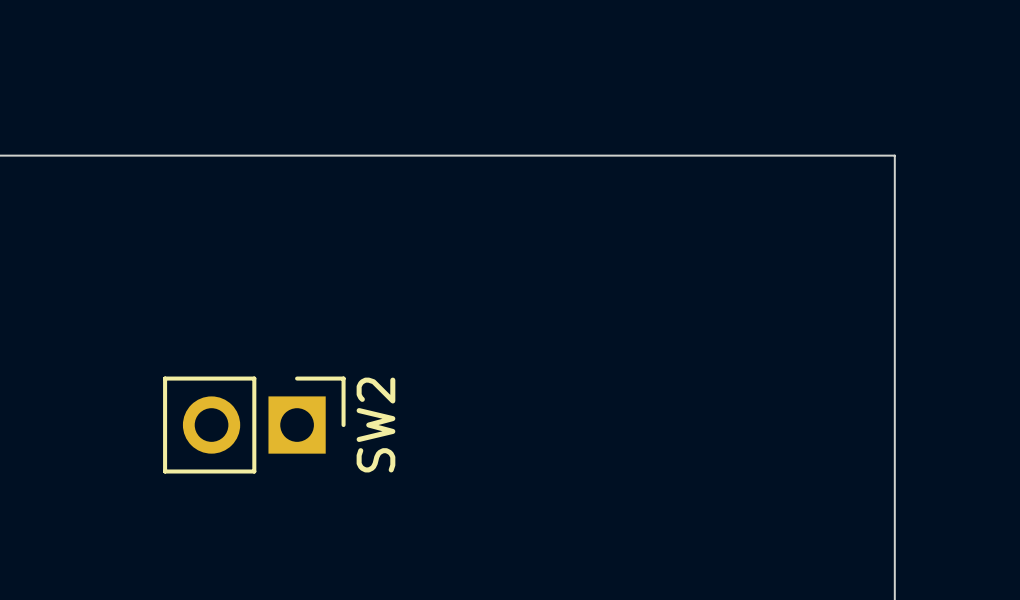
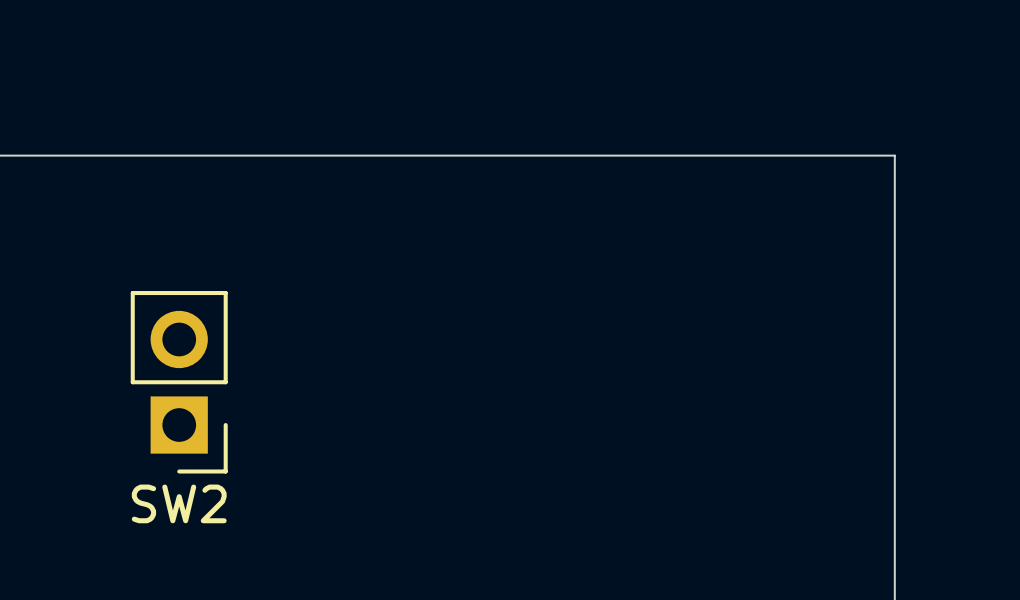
SW2 rotation: 0° (254, 425) -> 90° clockwise (179, 382)

